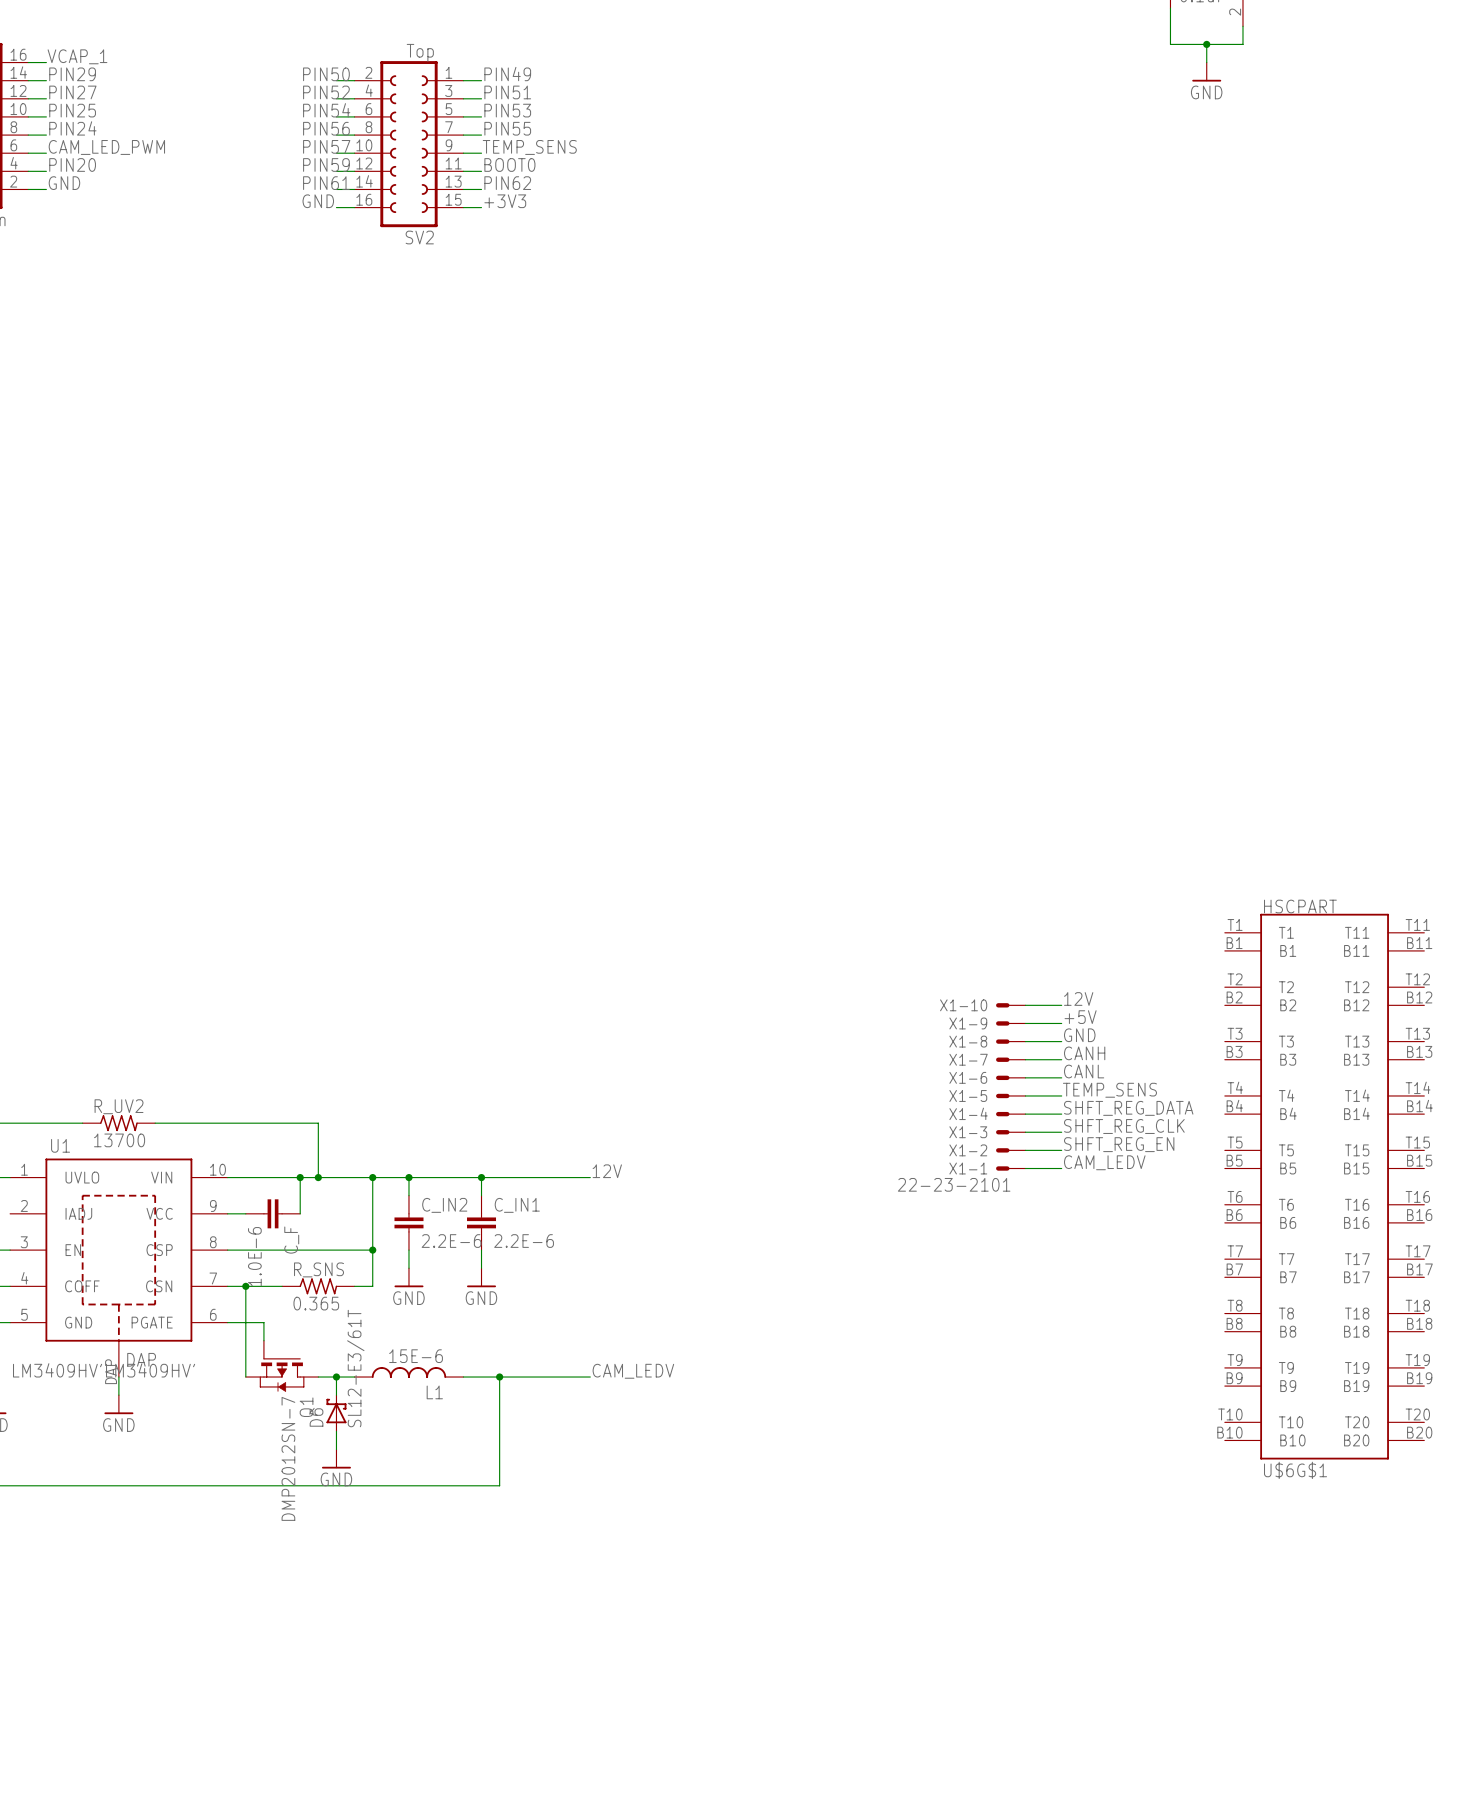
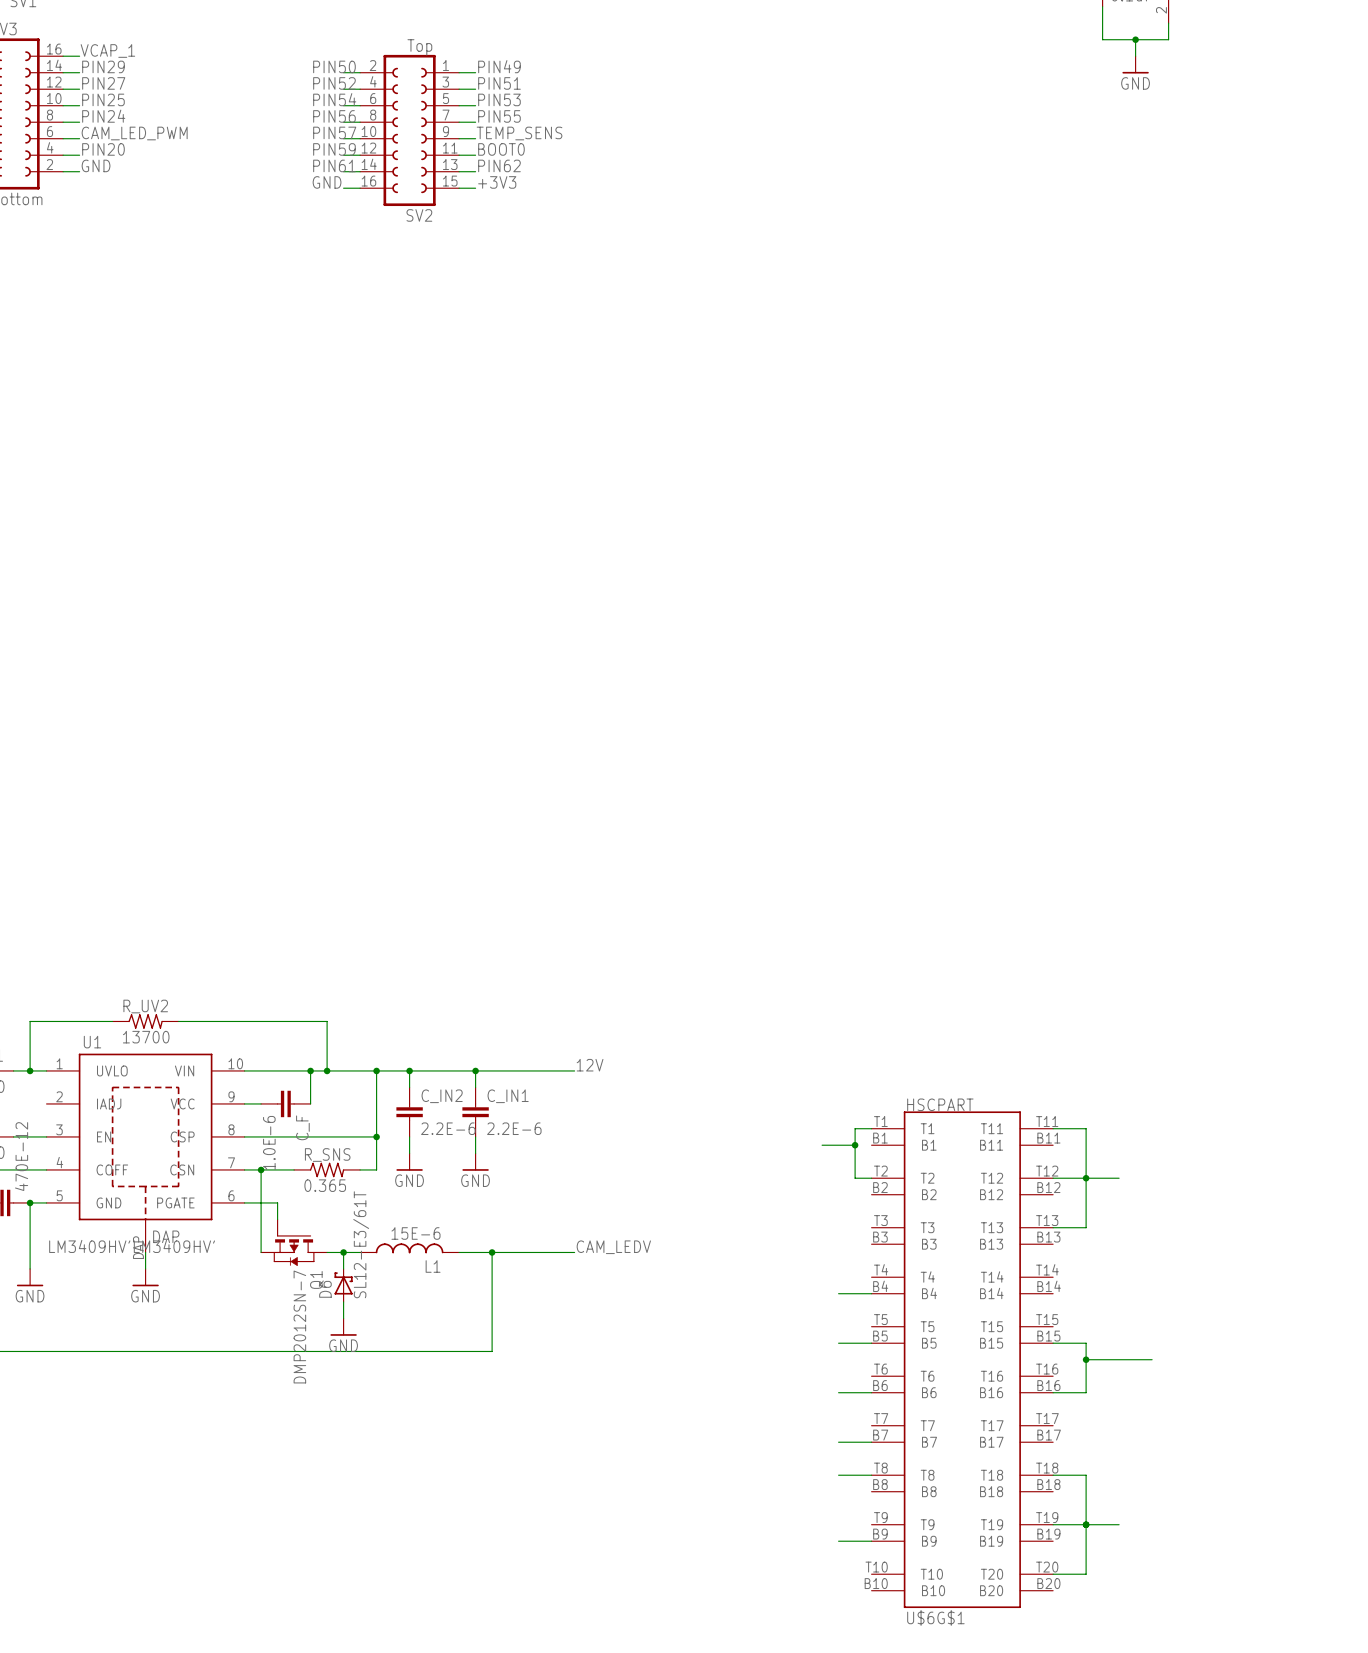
label: 12V (1078, 998) -> none
X1-10: (1010, 1005) -> none
wire: (1025, 1005) (1061, 1005) -> none
label: +5V (1080, 1017) -> none
X1-9: (1010, 1023) -> none
wire: (1025, 1023) (1061, 1023) -> none
label: GND (1079, 1035) -> none
X1-8: (1010, 1041) -> none
wire: (1025, 1041) (1061, 1041) -> none
label: CANH (1084, 1053) -> none
X1-7: (1010, 1059) -> none
wire: (1025, 1059) (1061, 1059) -> none
label: CANL (1084, 1071) -> none
X1-6: (1010, 1077) -> none
wire: (1025, 1077) (1061, 1077) -> none
label: TEMP_SENS (1109, 1090) -> none
X1-5: (1010, 1095) -> none
wire: (1025, 1095) (1061, 1095) -> none
label: SHFT_REG_DATA (1128, 1108) -> none
X1-4: (1010, 1114) -> none
wire: (1025, 1114) (1061, 1114) -> none
label: SHFT_REG_CLK (1124, 1126) -> none
X1-3: (1010, 1132) -> none
wire: (1025, 1132) (1061, 1132) -> none
label: SHFT_REG_EN (1119, 1144) -> none
X1-2: (1010, 1150) -> none
wire: (1025, 1150) (1061, 1150) -> none
label: CAM_LEDV (1104, 1162) -> none
X1-1: 22-23-2101 (1010, 1168) -> none
wire: (1025, 1168) (1061, 1168) -> none
U$6G$1 position: (1324, 1186) -> (962, 1359)
wire: none -> (871, 1128) (855, 1128) (855, 1178) (871, 1178)
wire: none -> (1053, 1128) (1086, 1128) (1086, 1227) (1053, 1227)
wire: none -> (822, 1145) (855, 1145)
junction: none -> (855, 1145)
wire: none -> (1053, 1178) (1119, 1178)
junction: none -> (1086, 1178)
wire: none -> (838, 1293) (871, 1293)
wire: none -> (838, 1343) (871, 1343)
wire: none -> (1053, 1343) (1086, 1343) (1086, 1392) (1053, 1392)
wire: none -> (1086, 1359) (1152, 1359)
junction: none -> (1086, 1359)
wire: none -> (838, 1392) (871, 1392)
wire: none -> (838, 1442) (871, 1442)
wire: none -> (838, 1475) (871, 1475)
wire: none -> (1053, 1475) (1086, 1475) (1086, 1574) (1053, 1574)
wire: none -> (1053, 1524) (1119, 1524)
junction: none -> (1086, 1524)
wire: none -> (838, 1541) (871, 1541)

